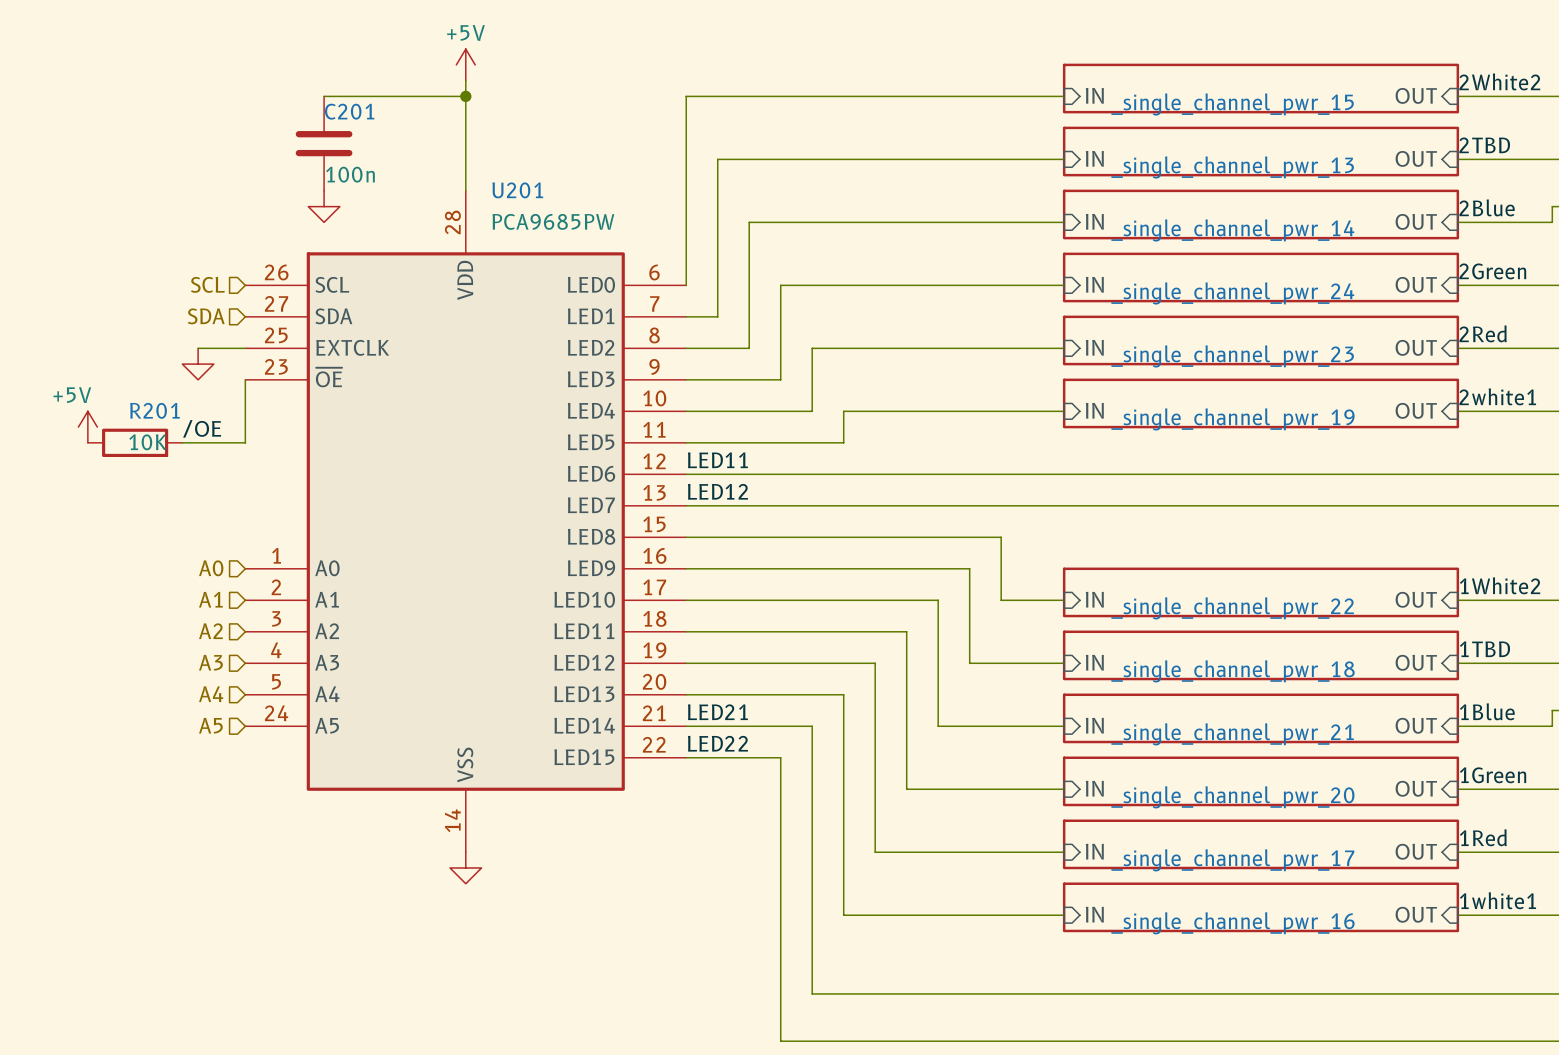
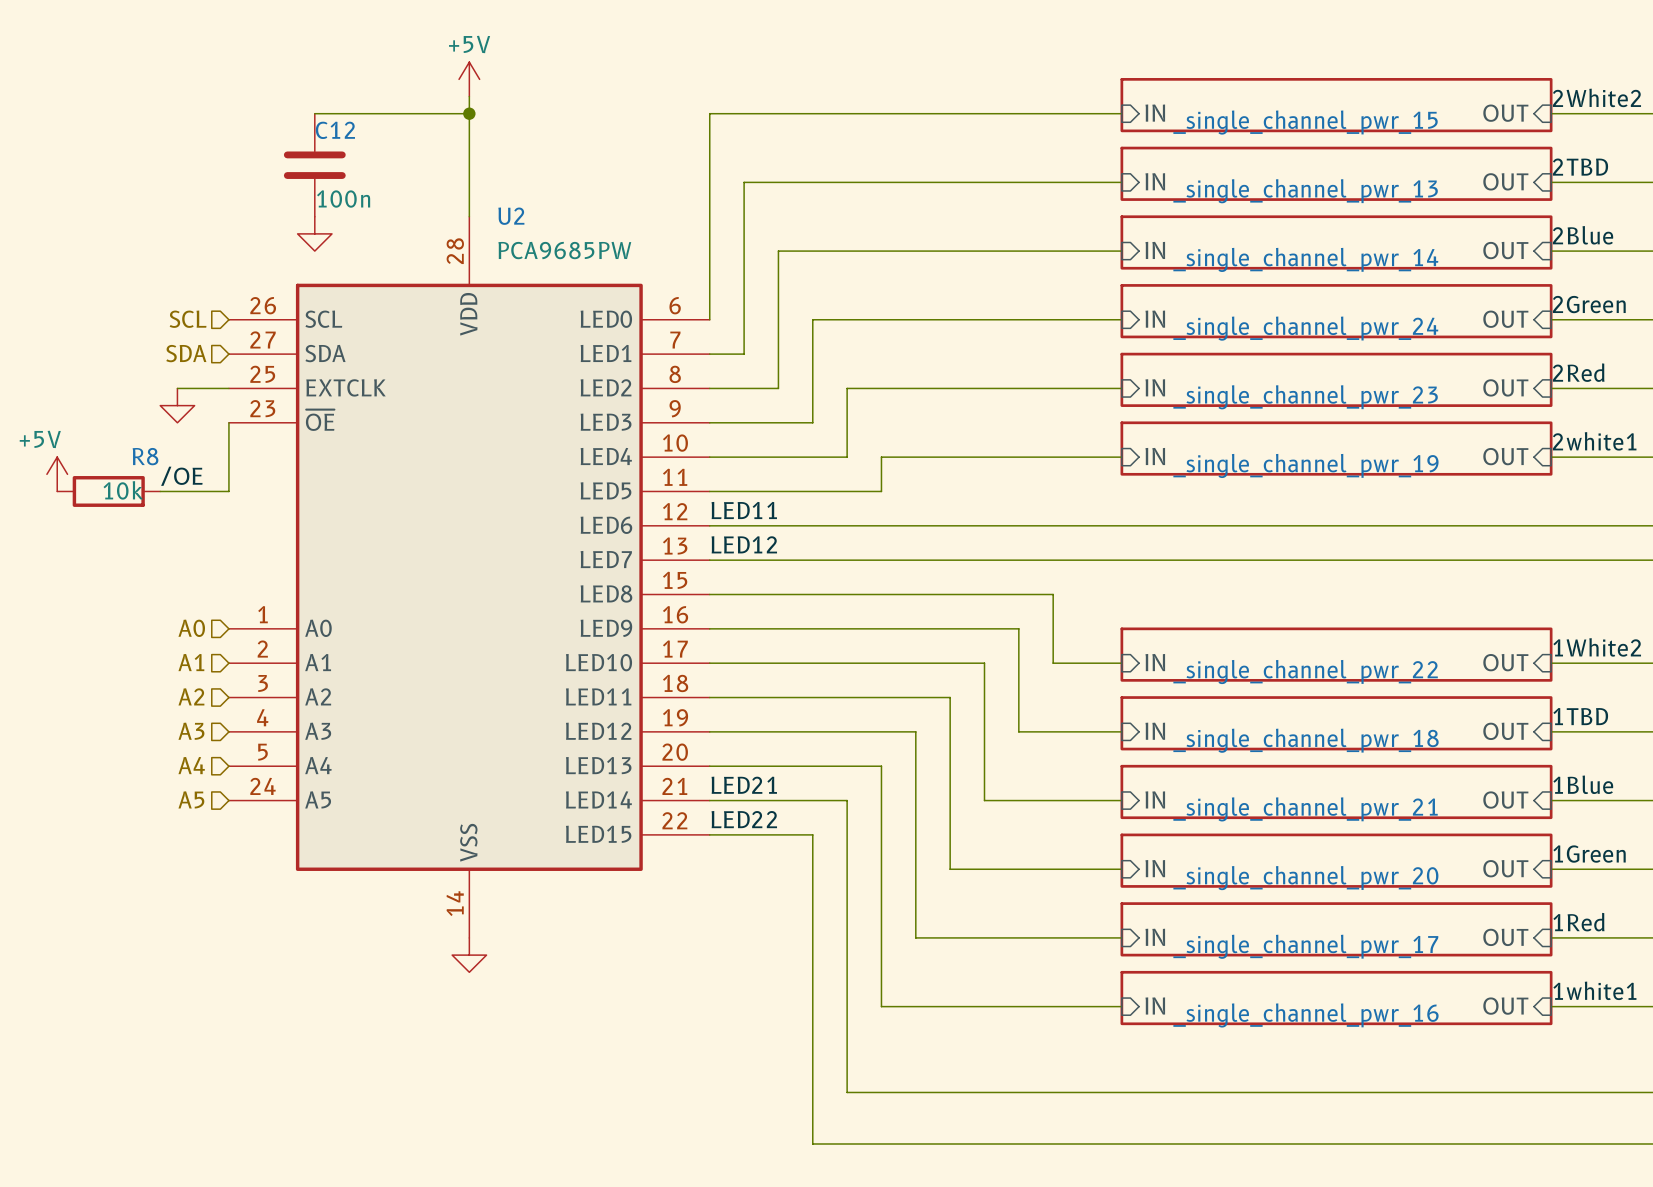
C201 name: C201 (349, 111) -> C12 (335, 130)
U201 name: U201 (517, 190) -> U2 (511, 216)
R201 name: R201 (154, 410) -> R8 (145, 456)
R201 value: 10K (147, 442) -> 10k (123, 490)

